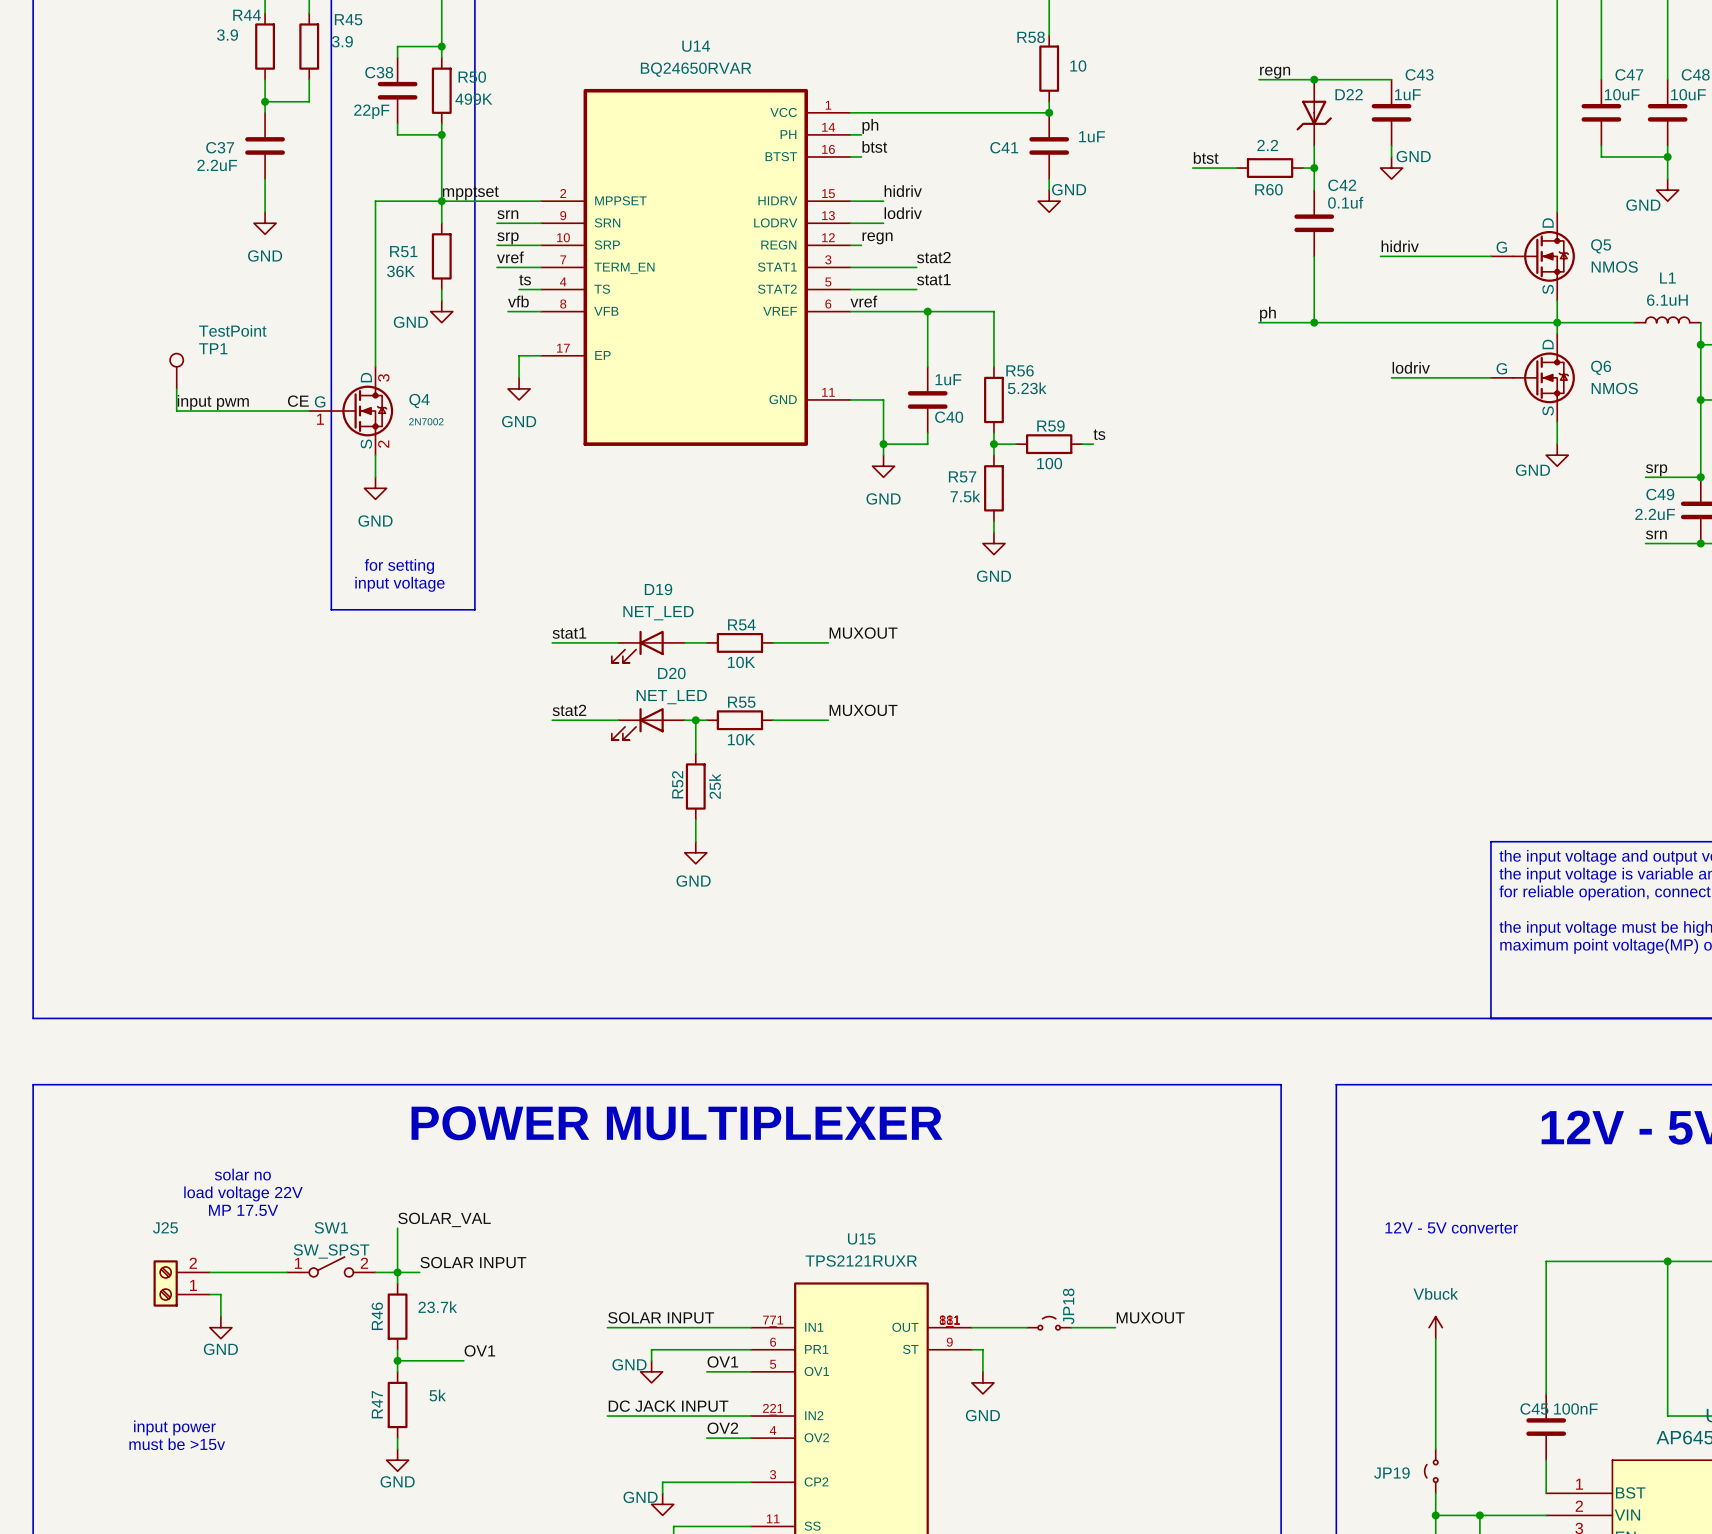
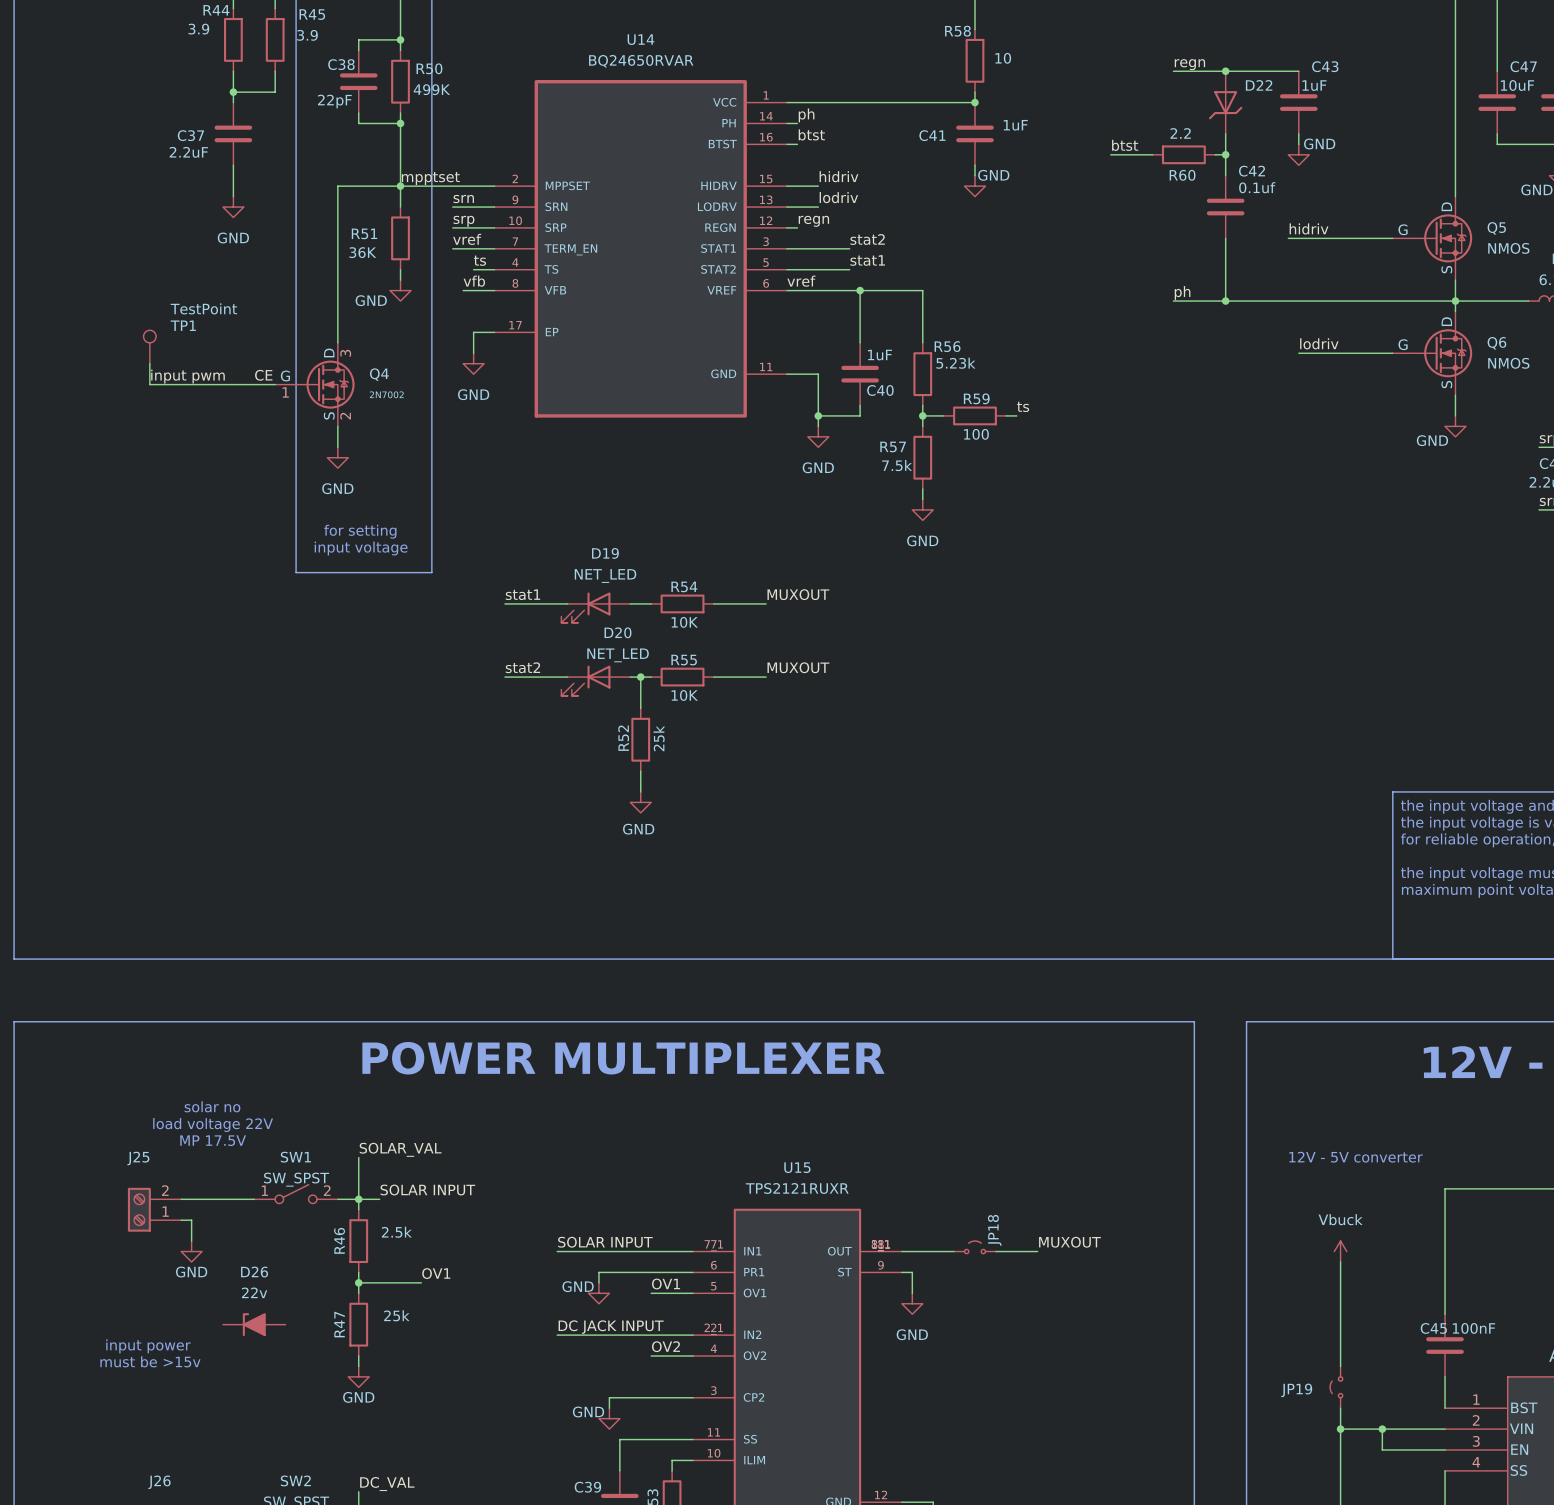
R46 value: 23.7k (437, 1307) -> 2.5k (396, 1232)
R47 value: 5k (437, 1395) -> 25k (396, 1315)
D26: none -> 22v (254, 1324)

